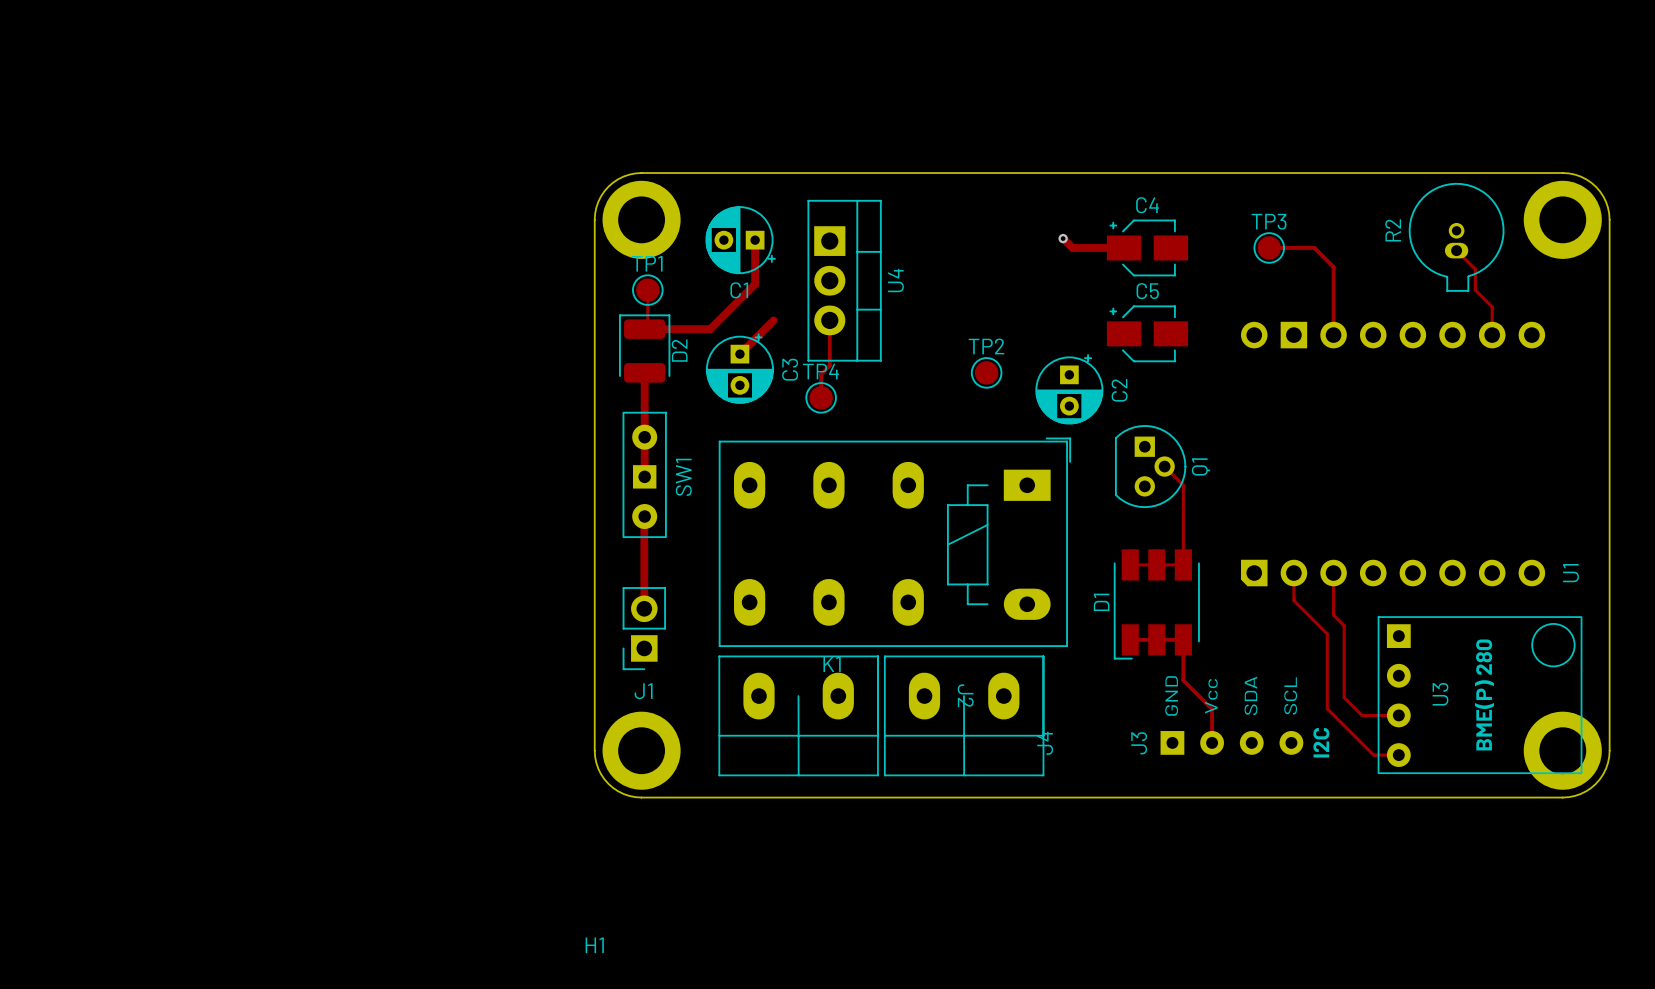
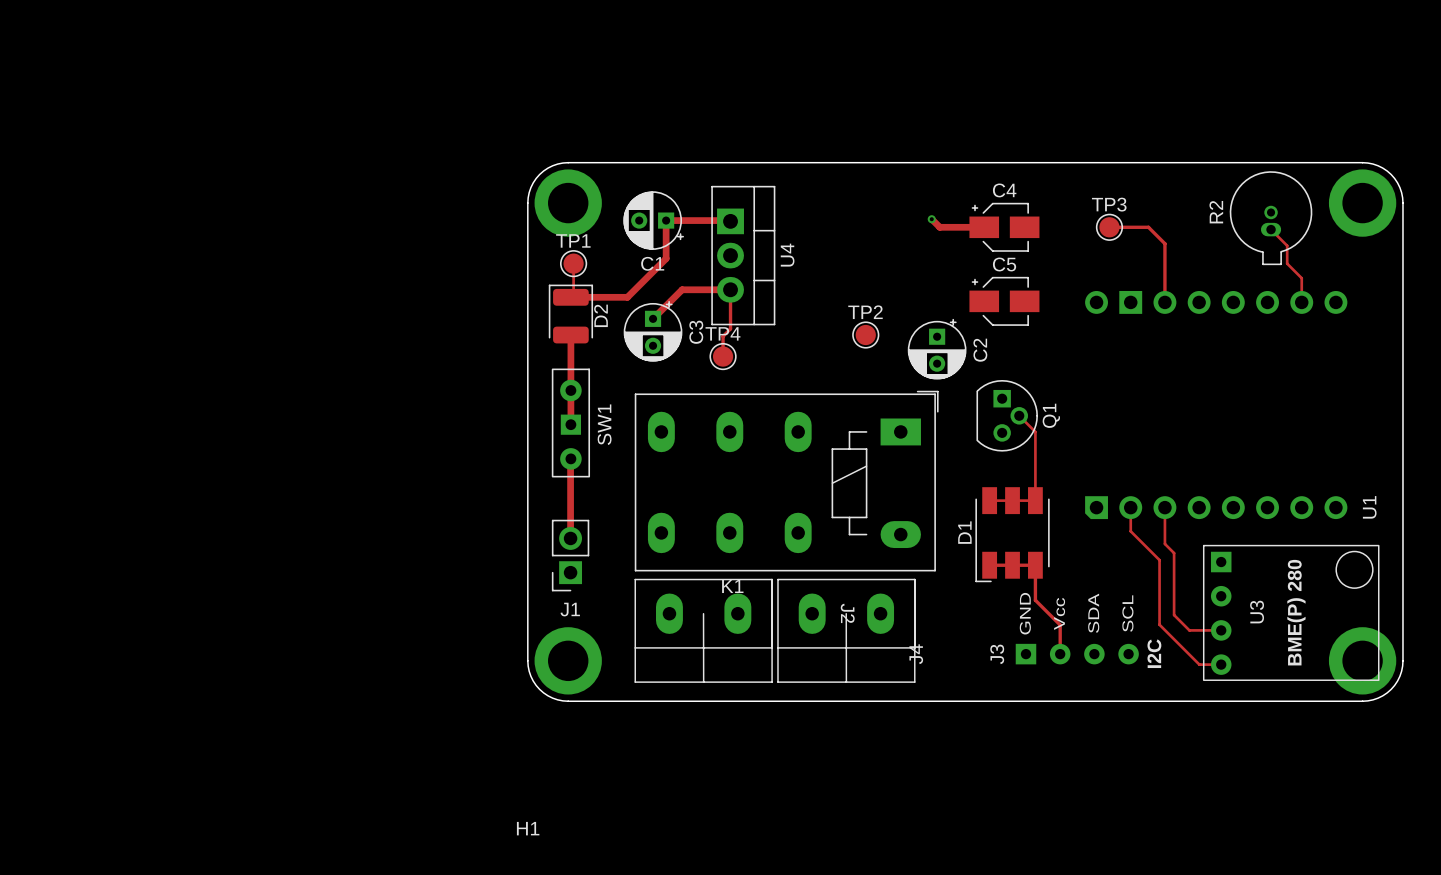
track: none -> (666, 220) (729, 220)
track: none -> (682, 289) (730, 289)

